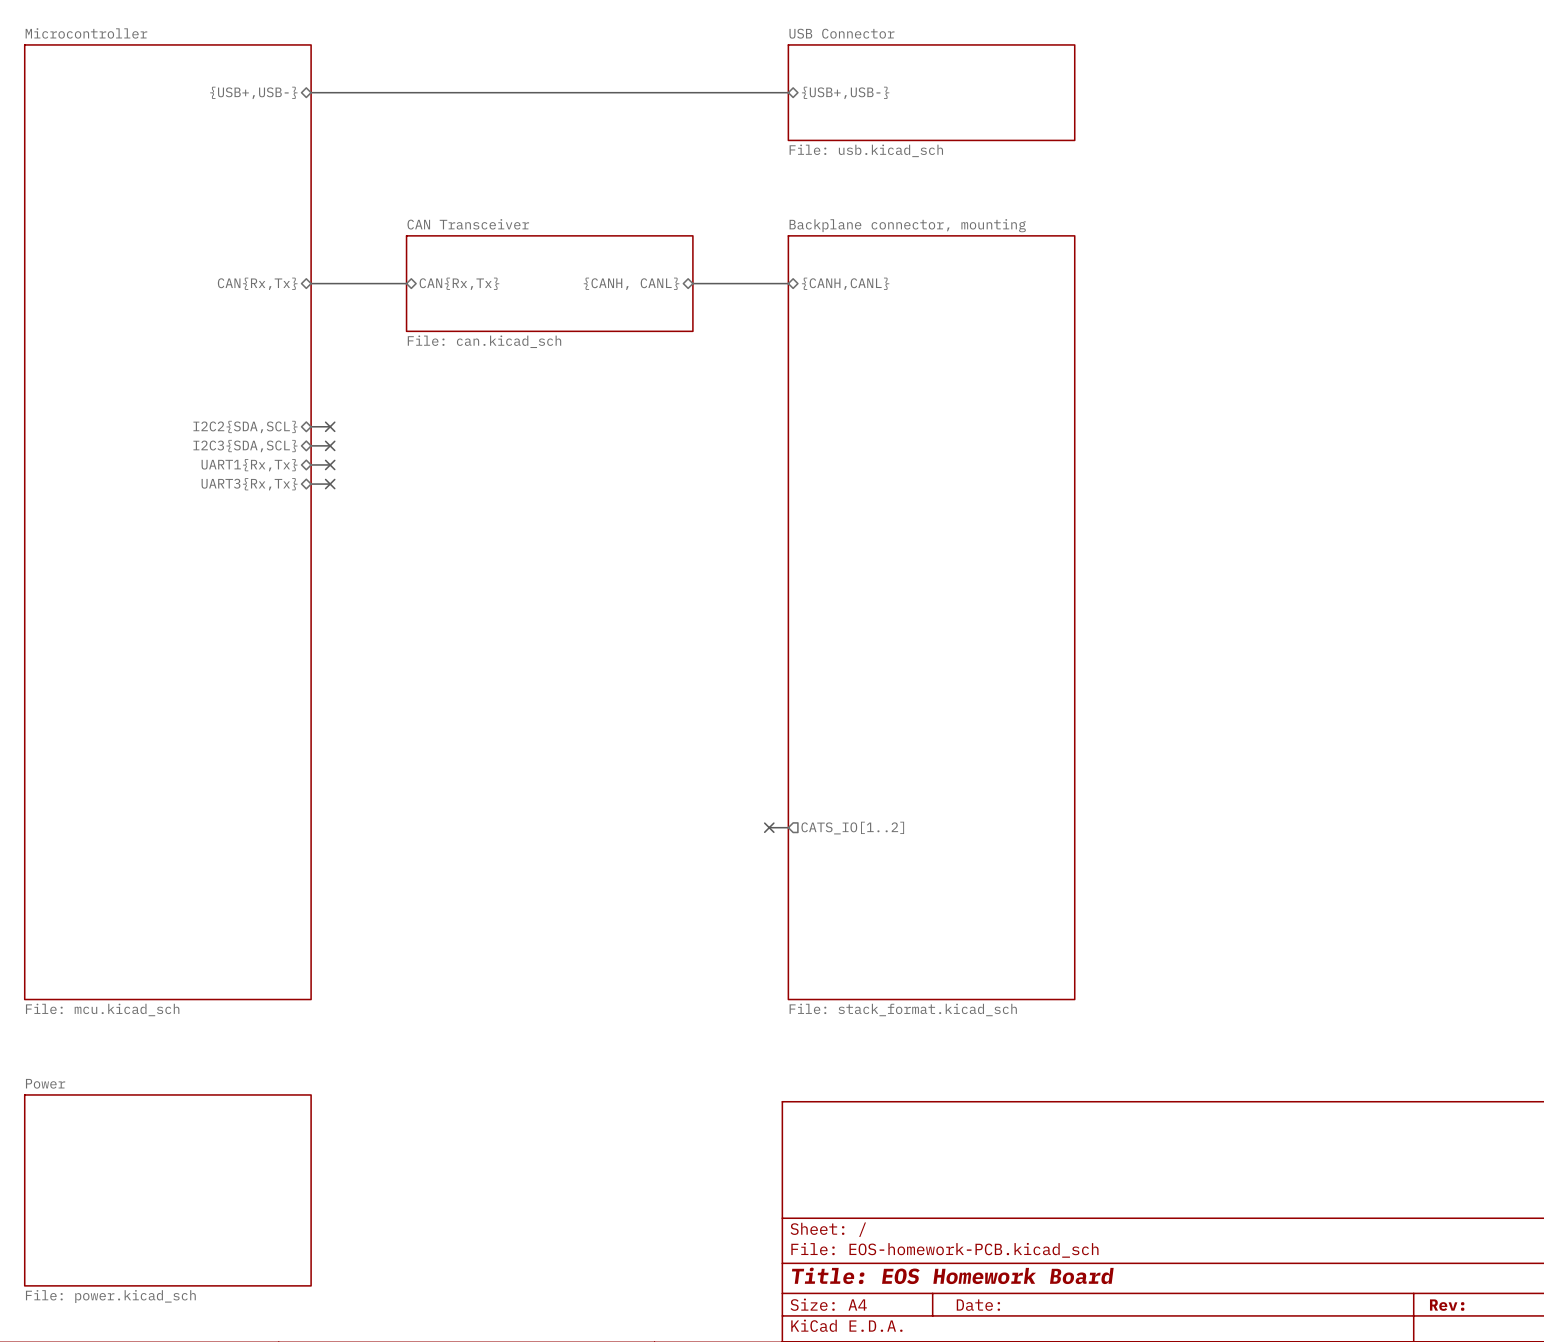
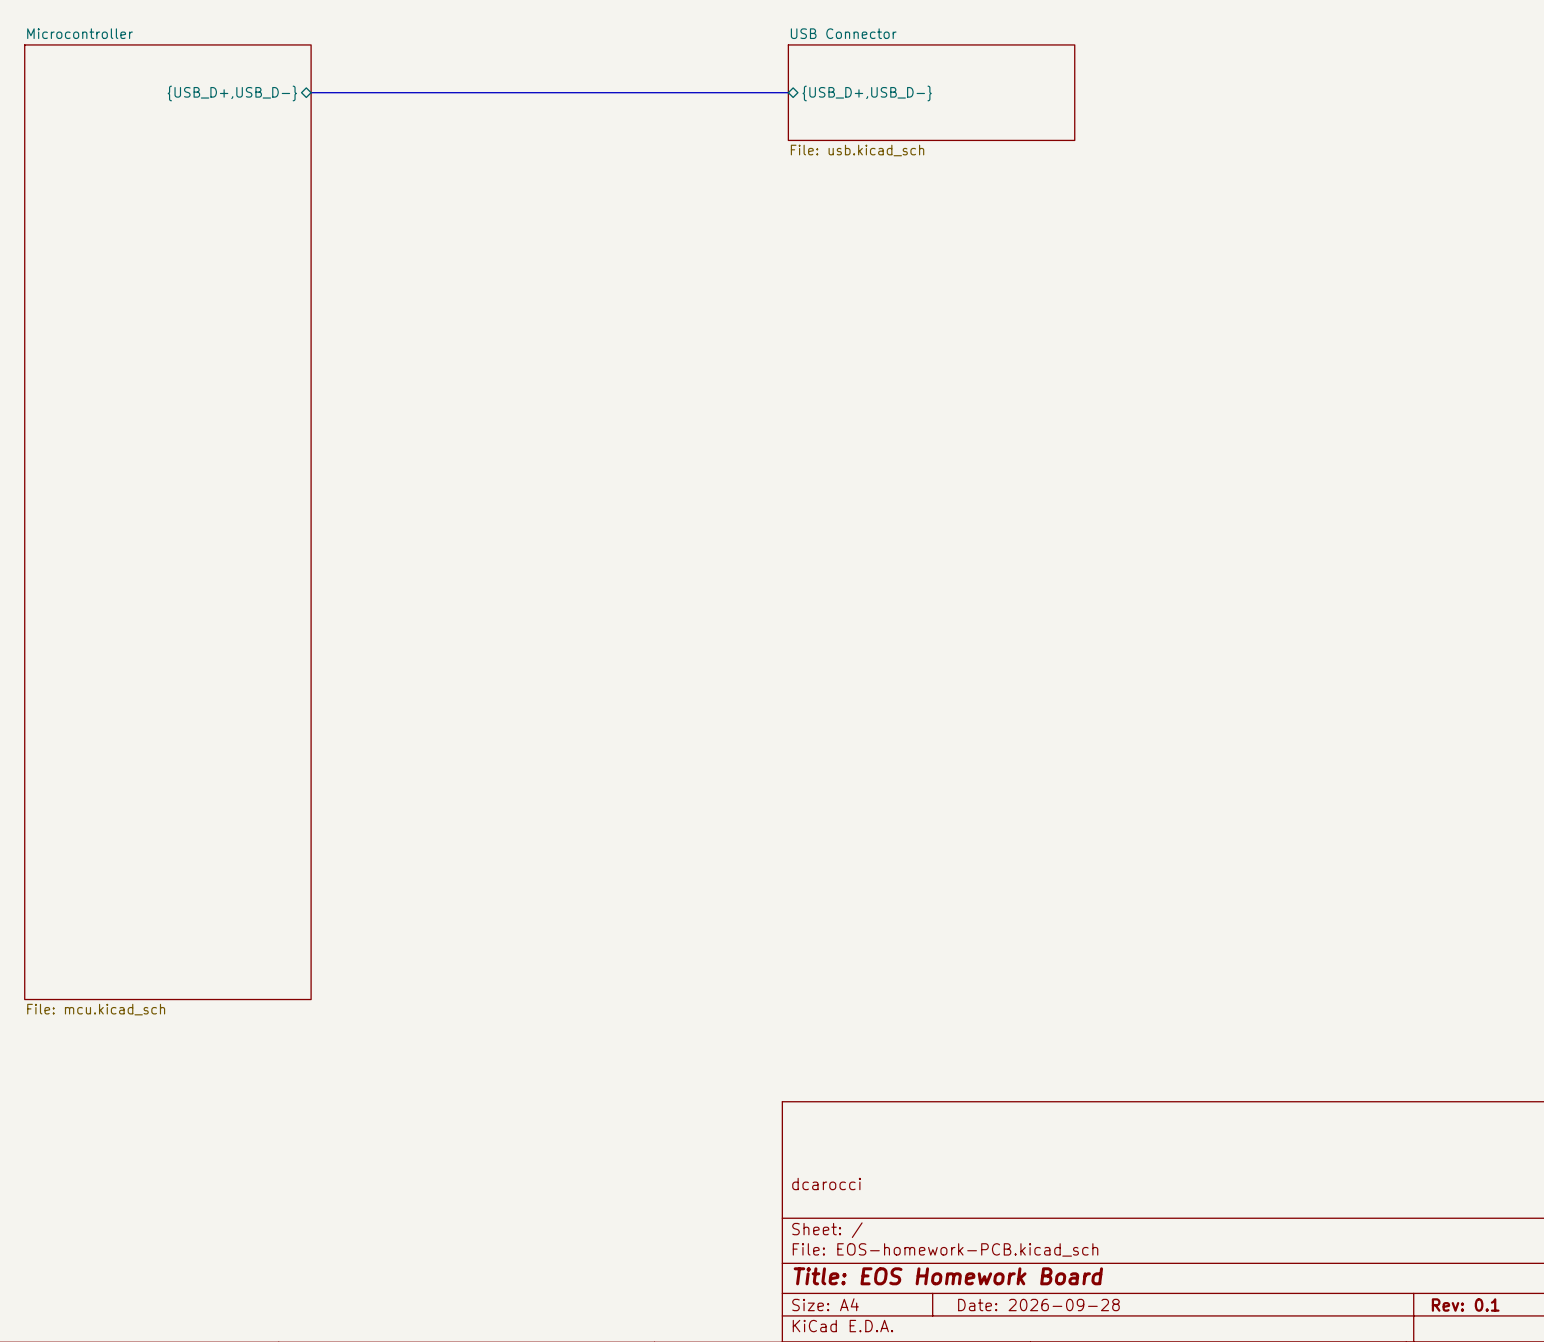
sheet pin: {USB+,USB-} (253, 92) -> {USB_D+,USB_D-} (232, 93)
sheet pin: {USB+,USB-} (845, 92) -> {USB_D+,USB_D-} (867, 93)
sheet pin: CAN{Rx,Tx} (257, 283) -> none
bus: (311, 283) (406, 283) -> none
sheet pin: CAN{Rx,Tx} (459, 283) -> none
sheet CAN Transceiver: File: can.kicad_sch (549, 283) -> none
sheet pin: {CANH, CANL} (631, 283) -> none
bus: (692, 283) (788, 283) -> none
sheet pin: {CANH,CANL} (845, 283) -> none
sheet pin: I2C2{SDA,SCL} (245, 426) -> none
bus: (311, 426) (330, 426) -> none
no-connect mark: (330, 426) -> none
bus: (311, 445) (330, 445) -> none
no-connect mark: (330, 445) -> none
sheet pin: I2C3{SDA,SCL} (245, 446) -> none
bus: (311, 464) (330, 464) -> none
no-connect mark: (330, 464) -> none
sheet pin: UART1{Rx,Tx} (249, 465) -> none
sheet pin: UART3{Rx,Tx} (249, 484) -> none
bus: (311, 484) (330, 484) -> none
no-connect mark: (330, 484) -> none
sheet Backplane connector, mounting: File: stack_format.kicad_sch (931, 617) -> none
bus: (769, 827) (788, 827) -> none
no-connect mark: (769, 827) -> none
sheet pin: CATS_IO[1..2] (852, 828) -> none
title block: none -> dcarocci (826, 1184)
sheet Power: File: power.kicad_sch (167, 1190) -> none
title block: Date: (978, 1305) -> Date: 2026-09-28 (1038, 1305)
title block: Rev: (1447, 1305) -> Rev: 0.1 (1465, 1305)

